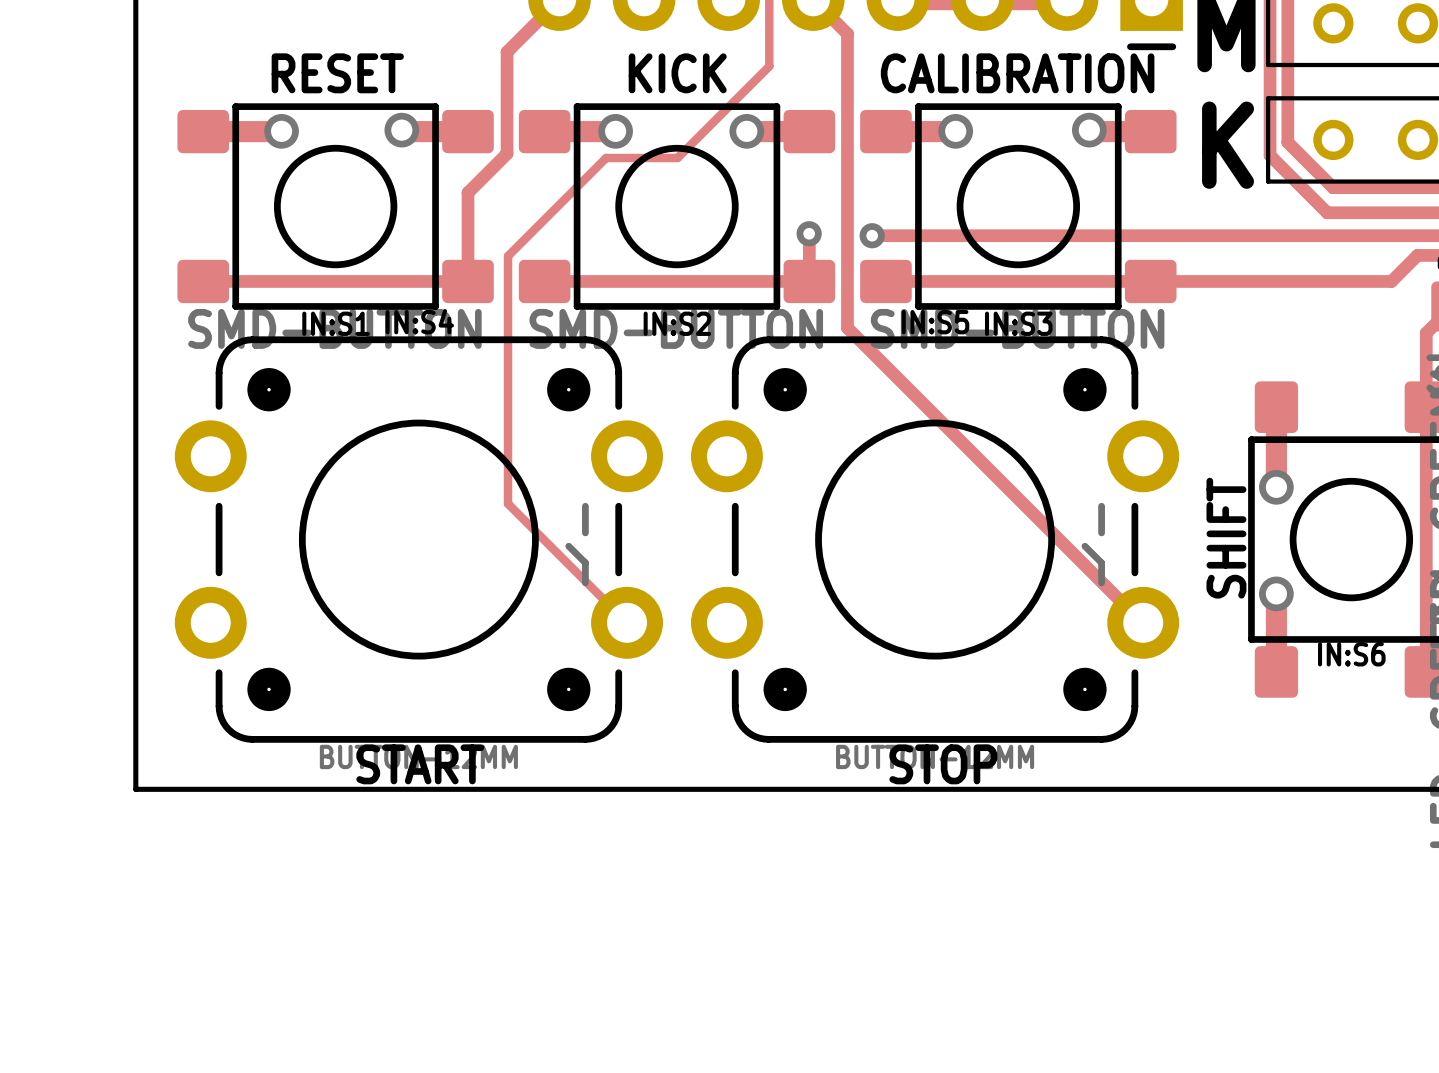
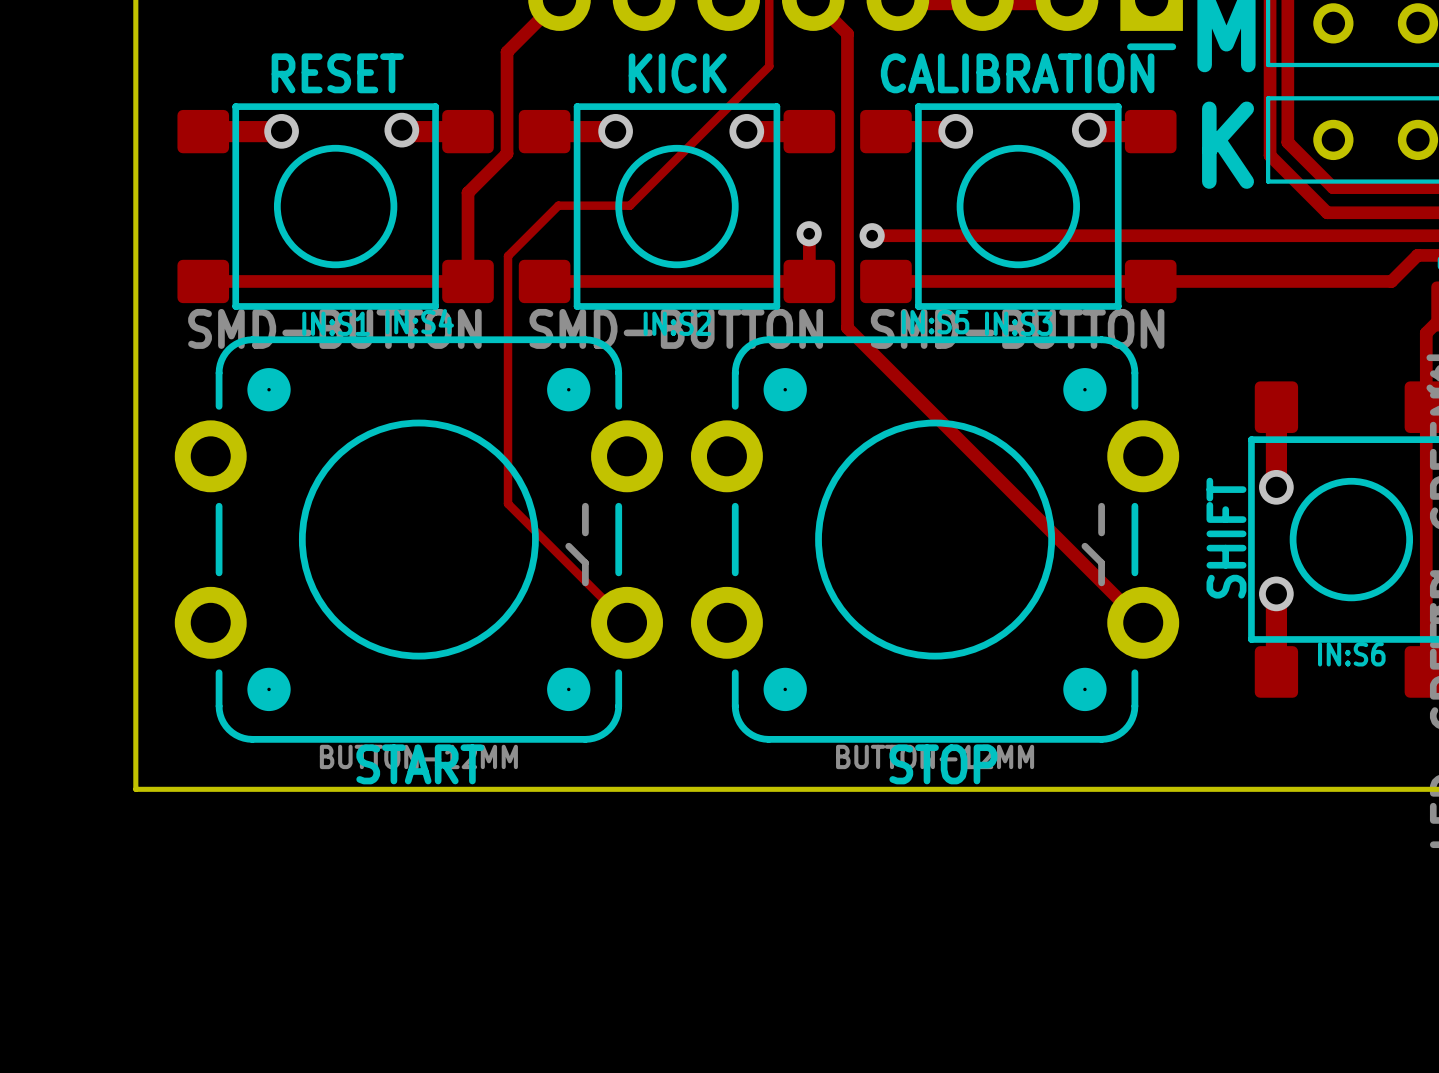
track: (677, 157) (606, 157) (558, 205) -> (677, 157) (629, 205) (558, 205)

